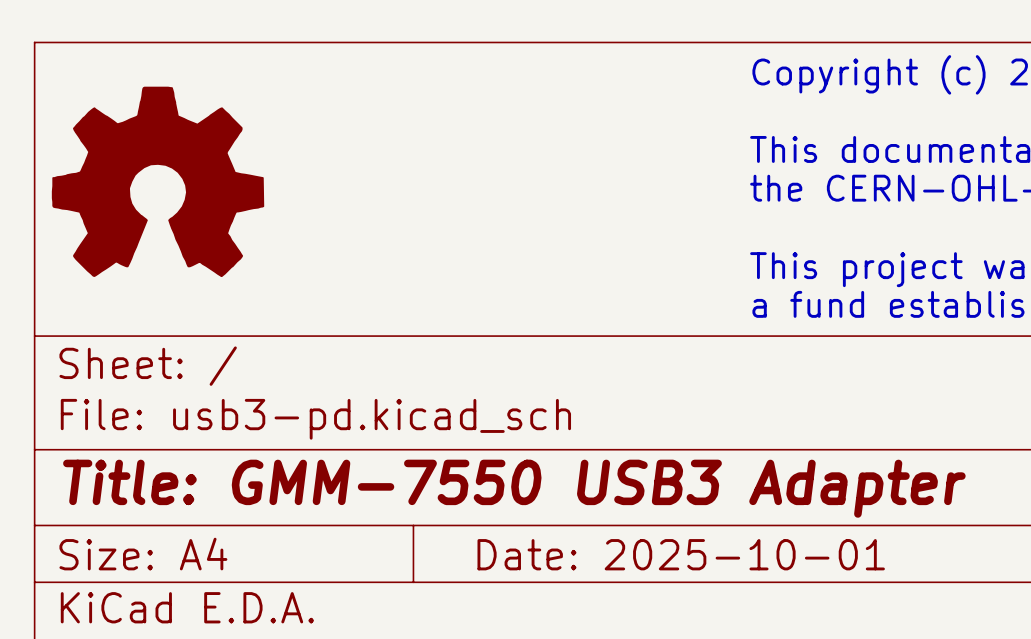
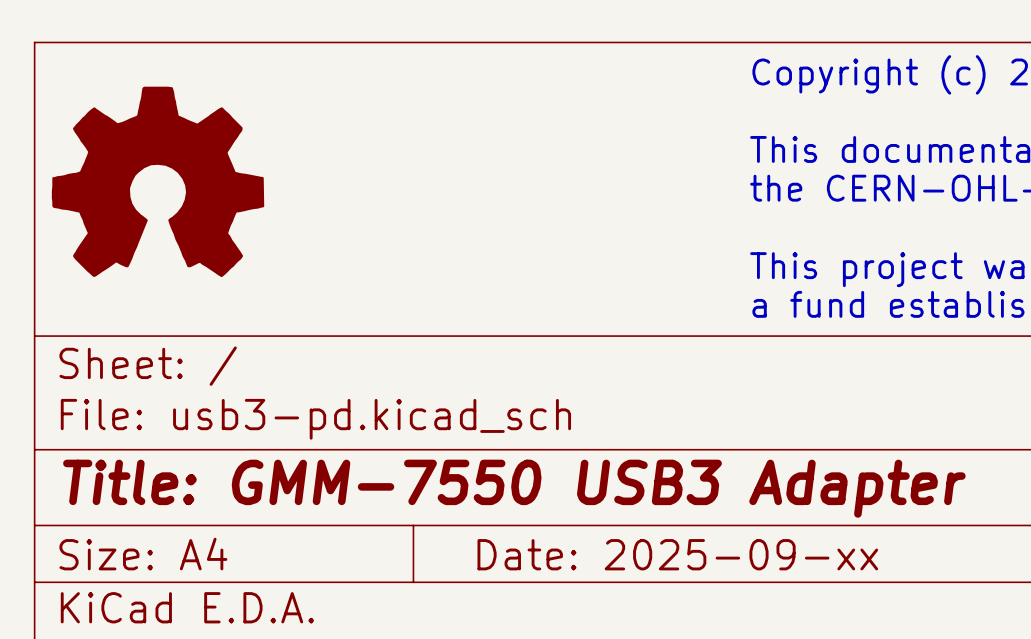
title block: Date: 2025-10-01 (681, 554) -> Date: 2025-09-xx (677, 554)

